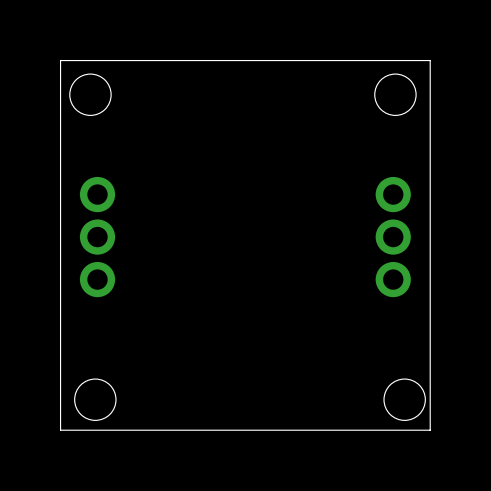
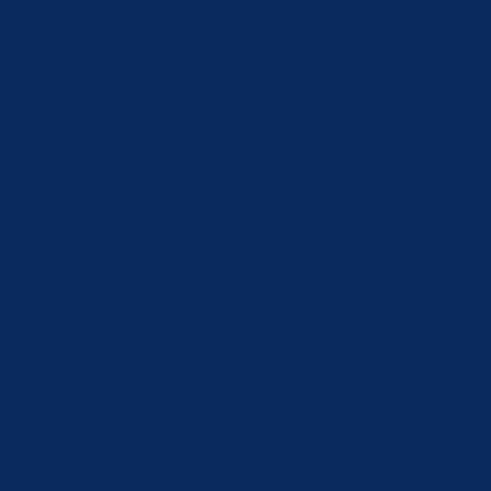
board edge: (430, 60) (60, 60) (60, 430) (430, 430) (430, 60) -> none
round board edge: [69, 73, 112, 116] -> none
round board edge: [374, 73, 417, 116] -> none
part: (97, 237) -> none
part: (393, 237) -> none
round board edge: [74, 378, 117, 421] -> none
round board edge: [383, 378, 426, 421] -> none

